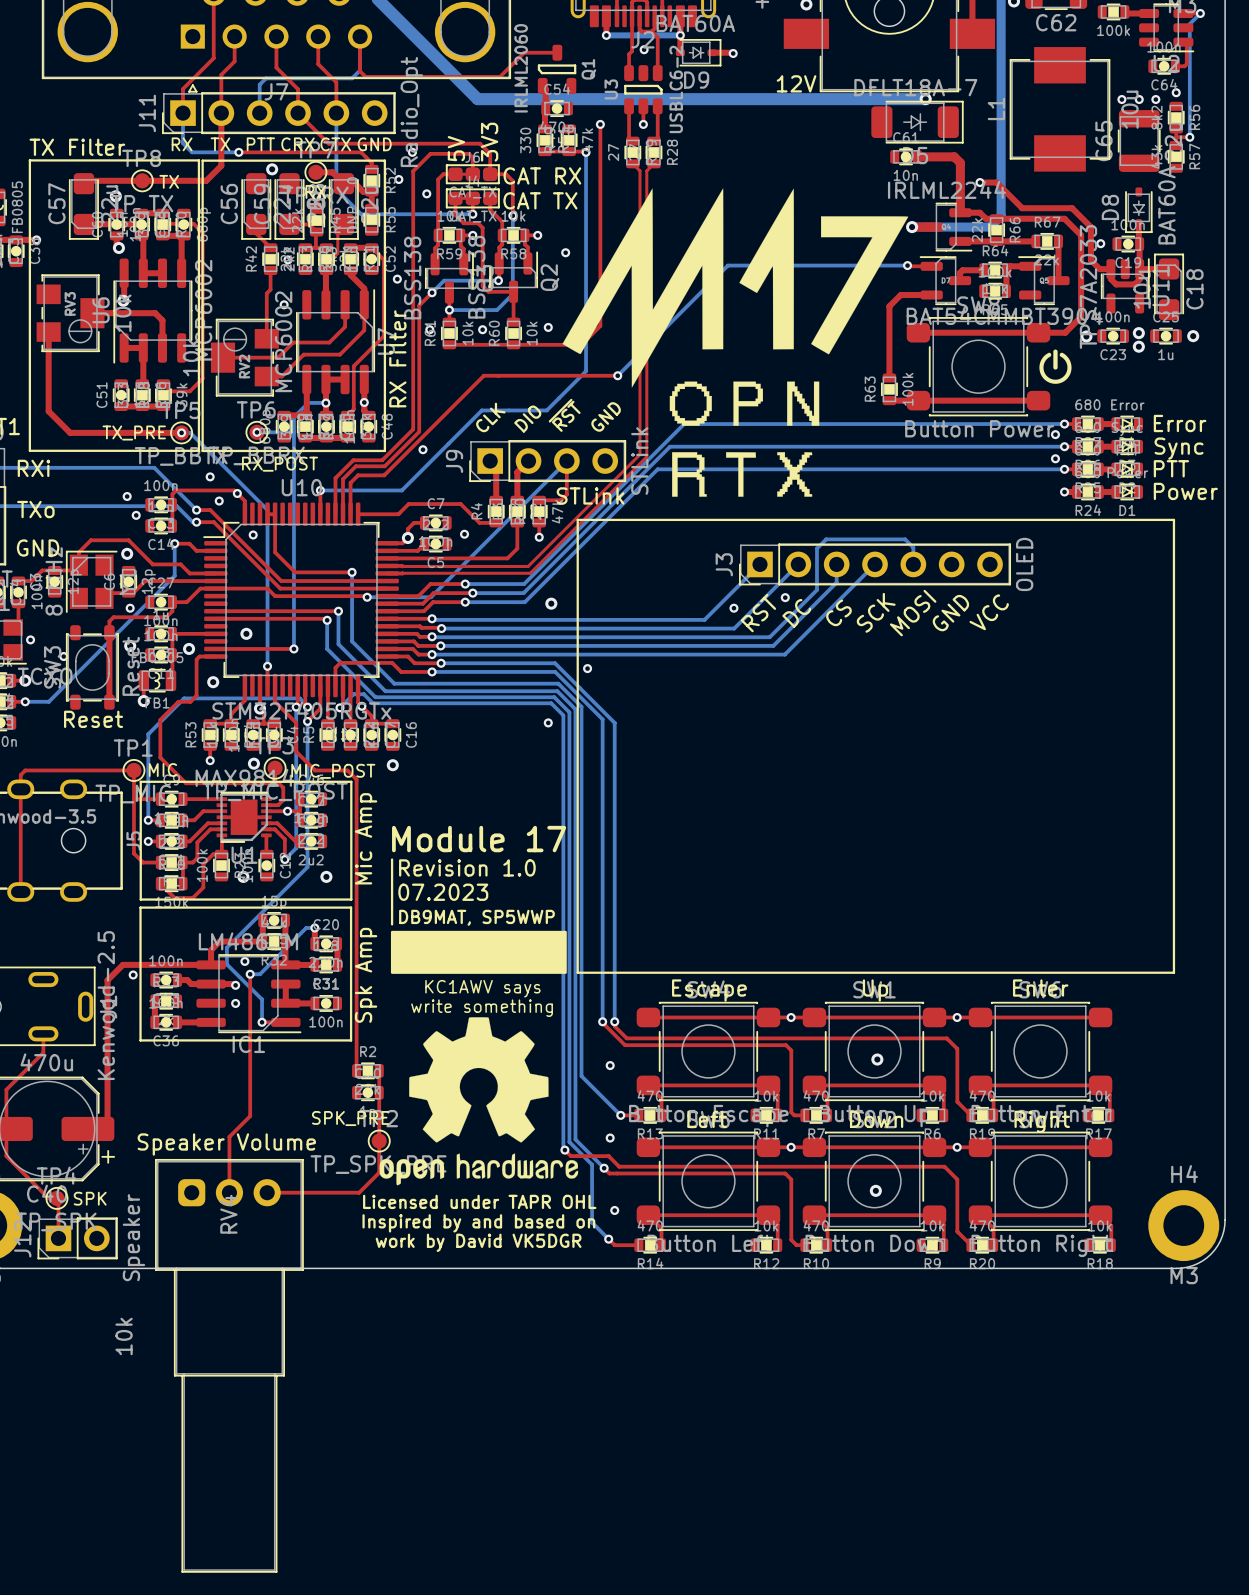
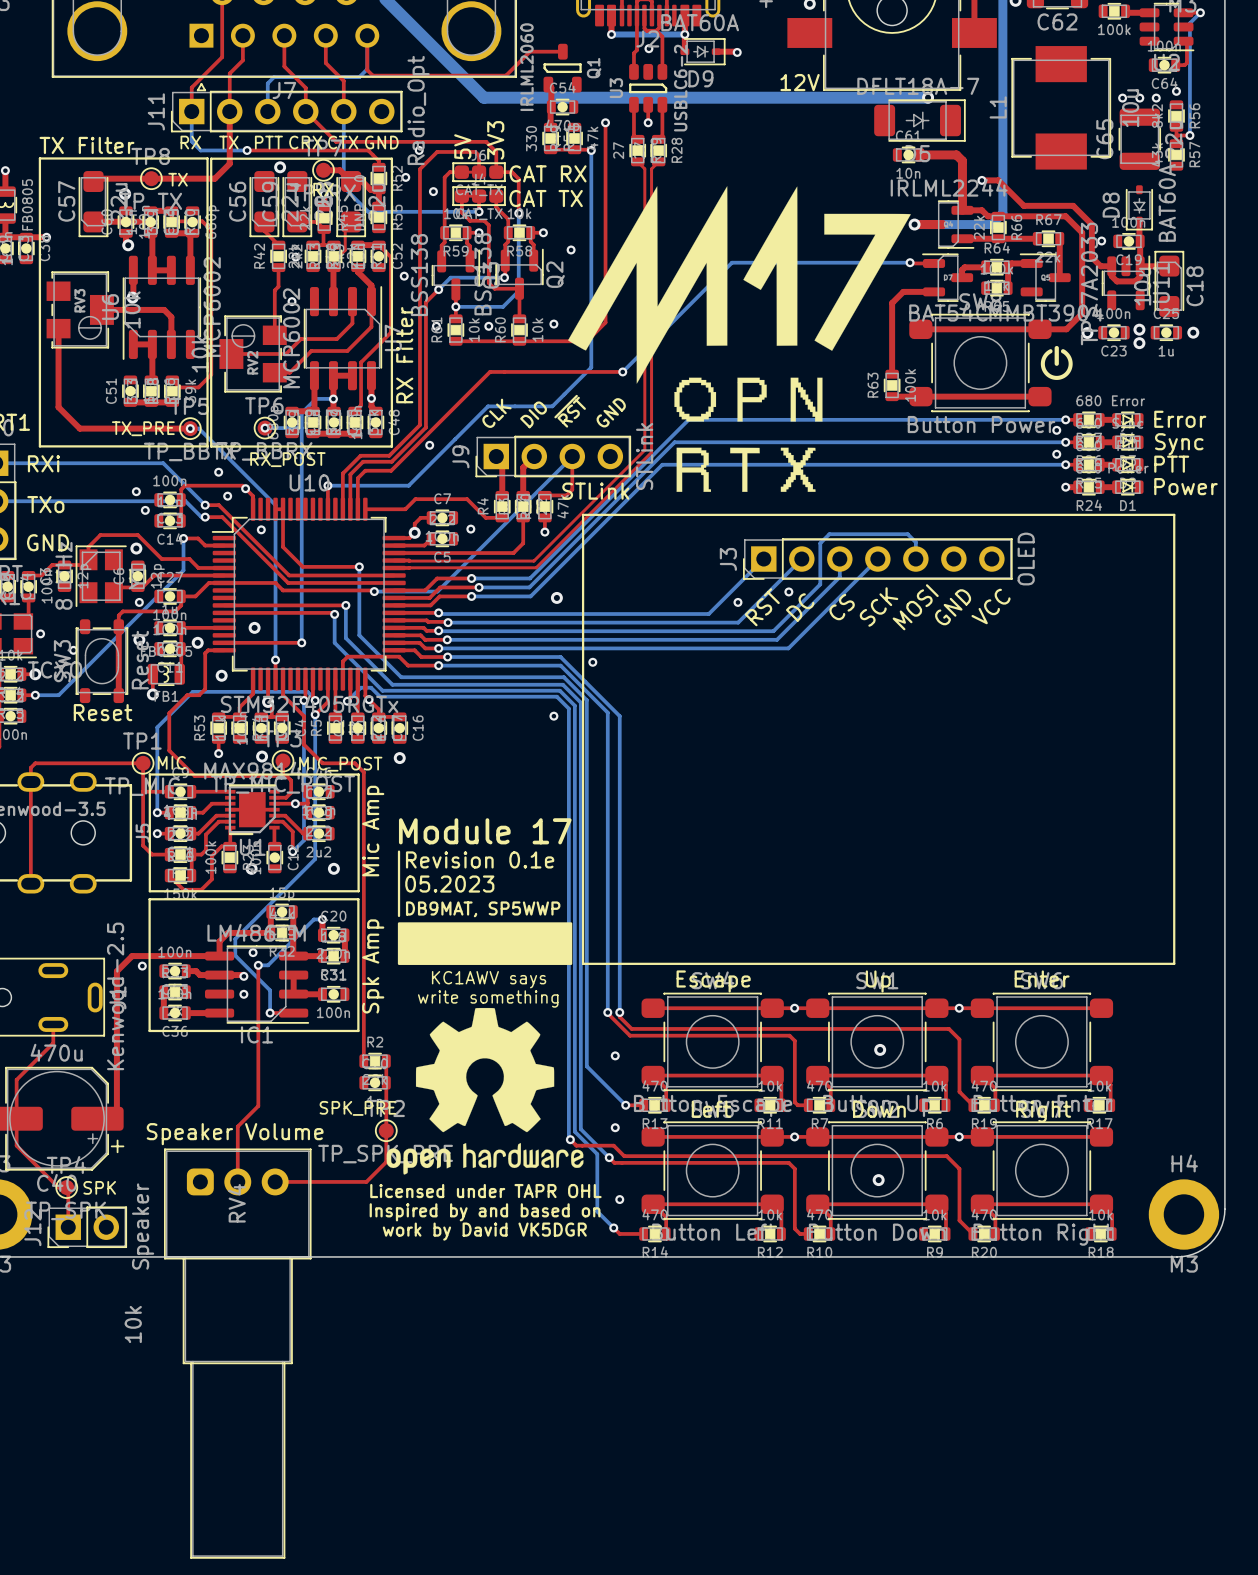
text: Revision 1.0 (467, 867) -> Revision 0.1e (480, 859)
text: 07.2023 (443, 892) -> 05.2023 (449, 884)

